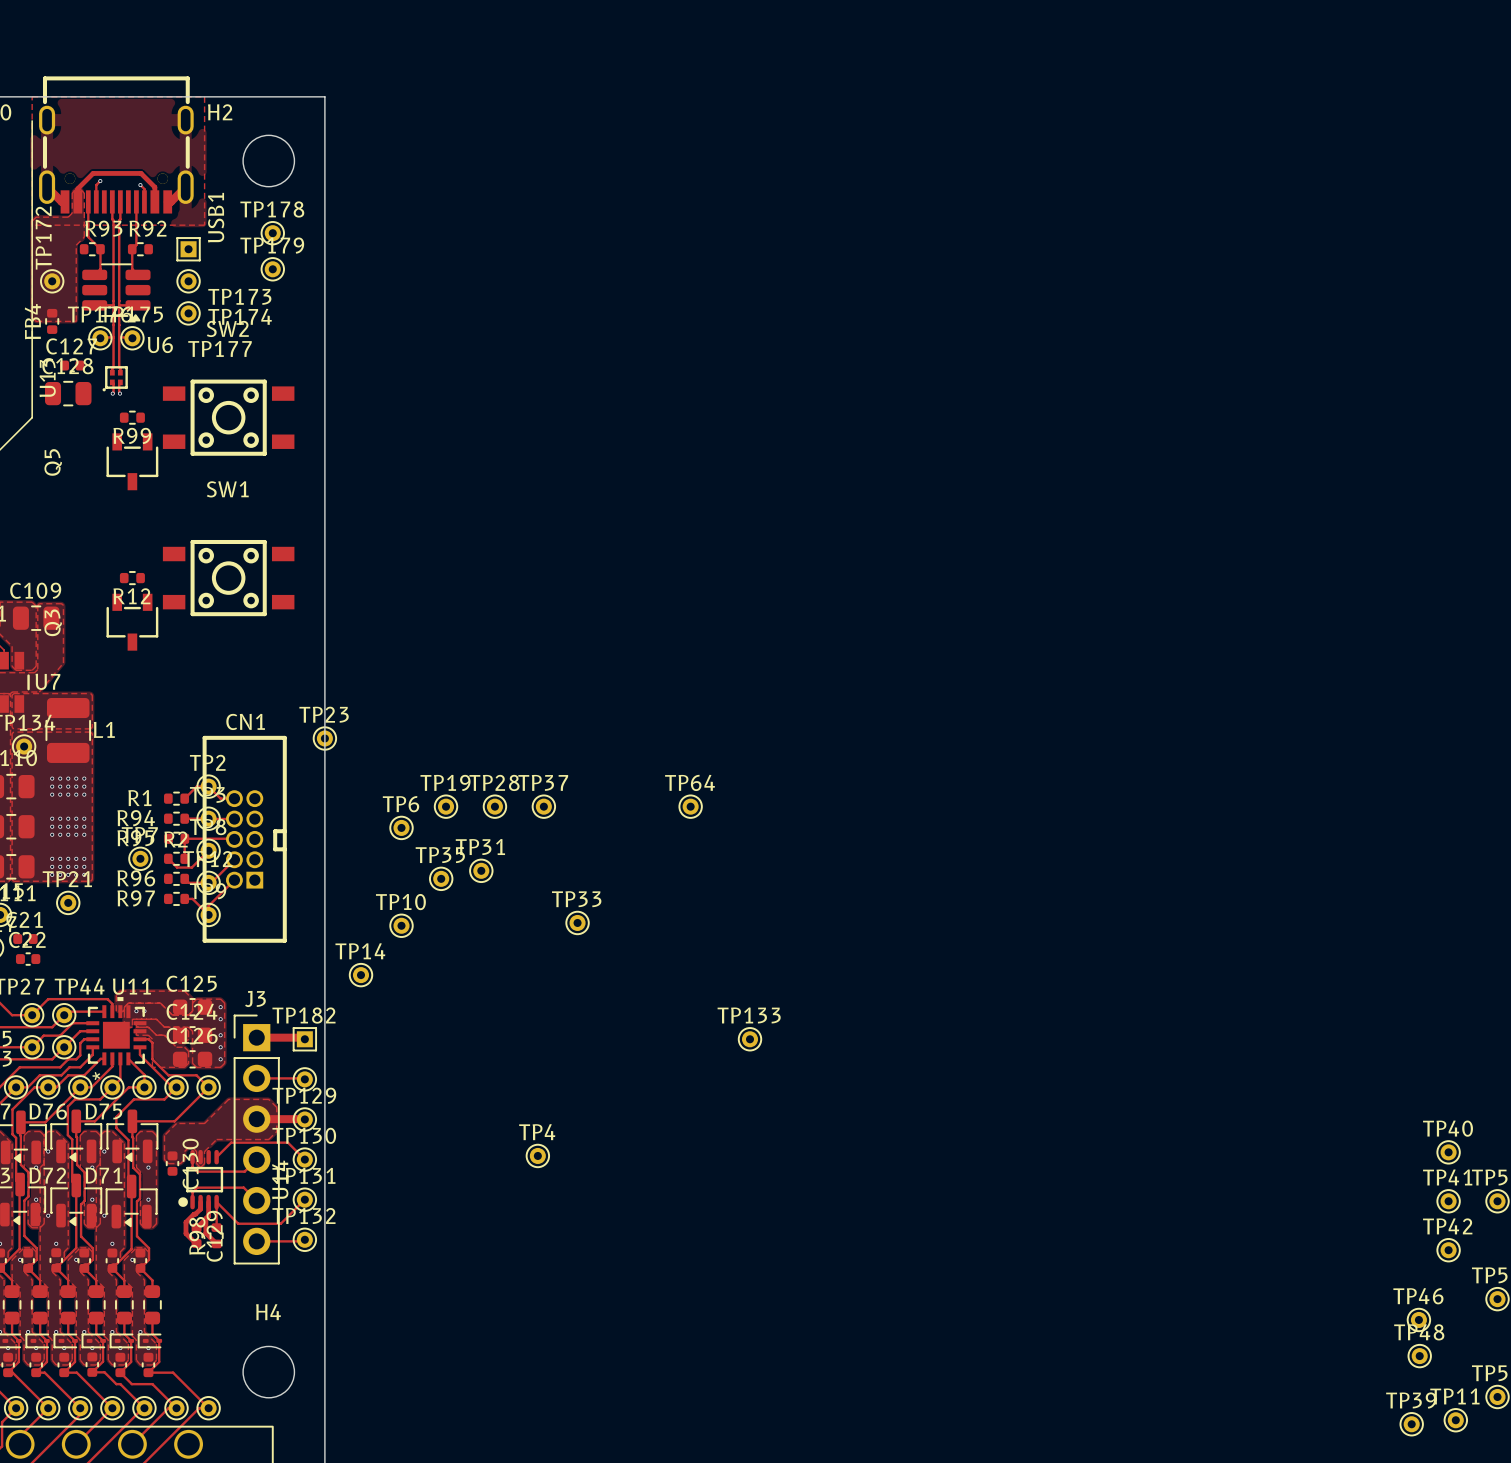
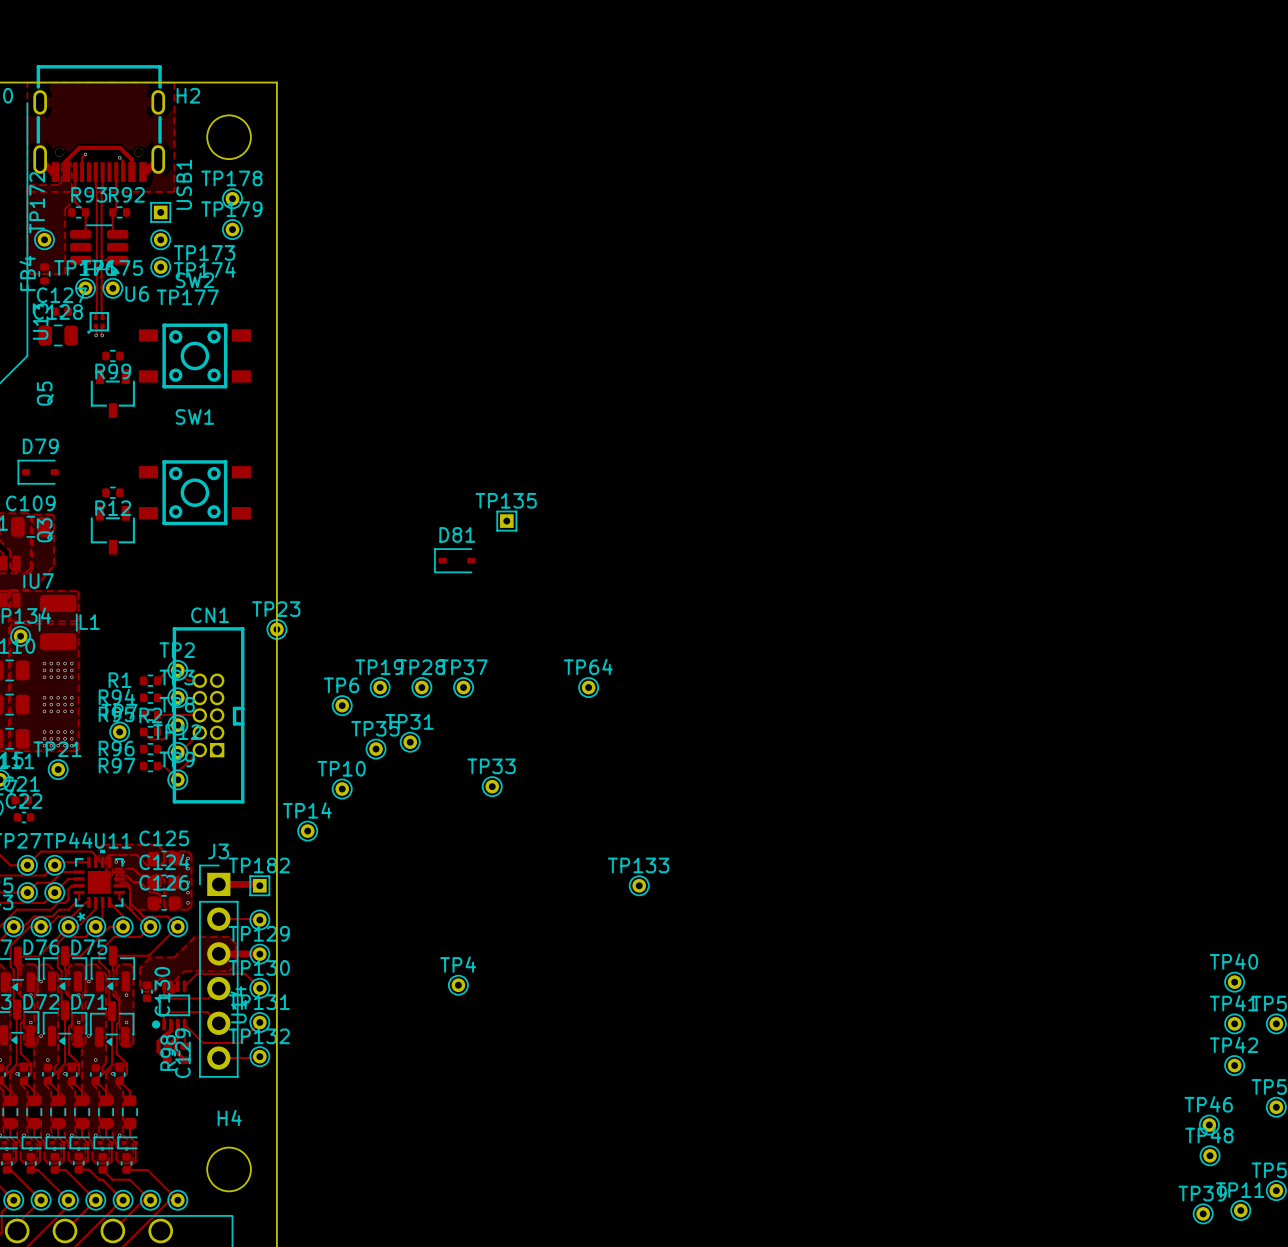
D79: none -> (38, 472)
TP135: none -> (506, 521)
D81: none -> (454, 560)

